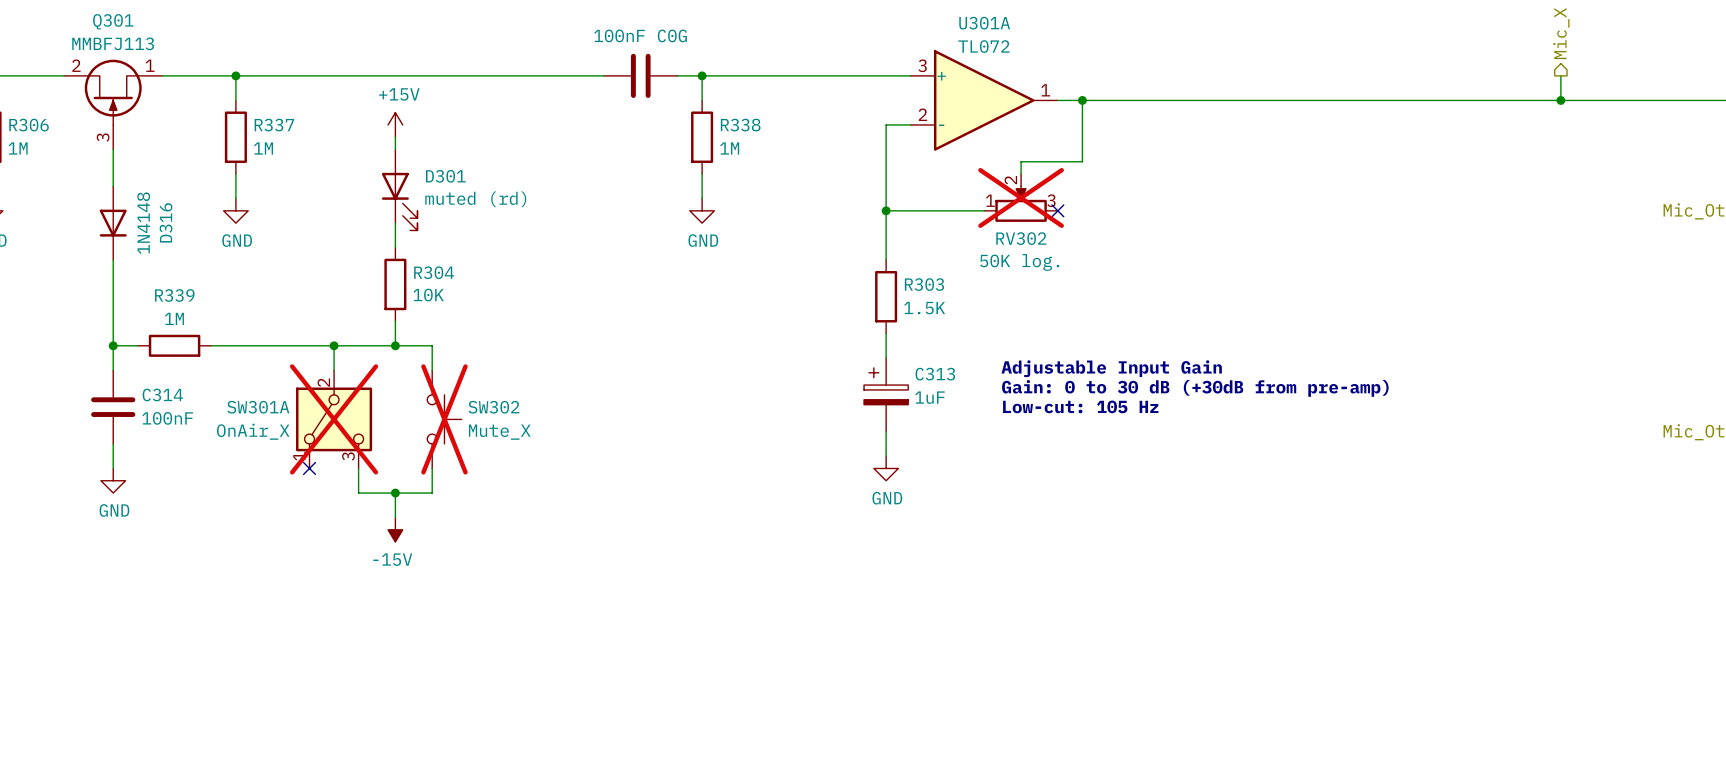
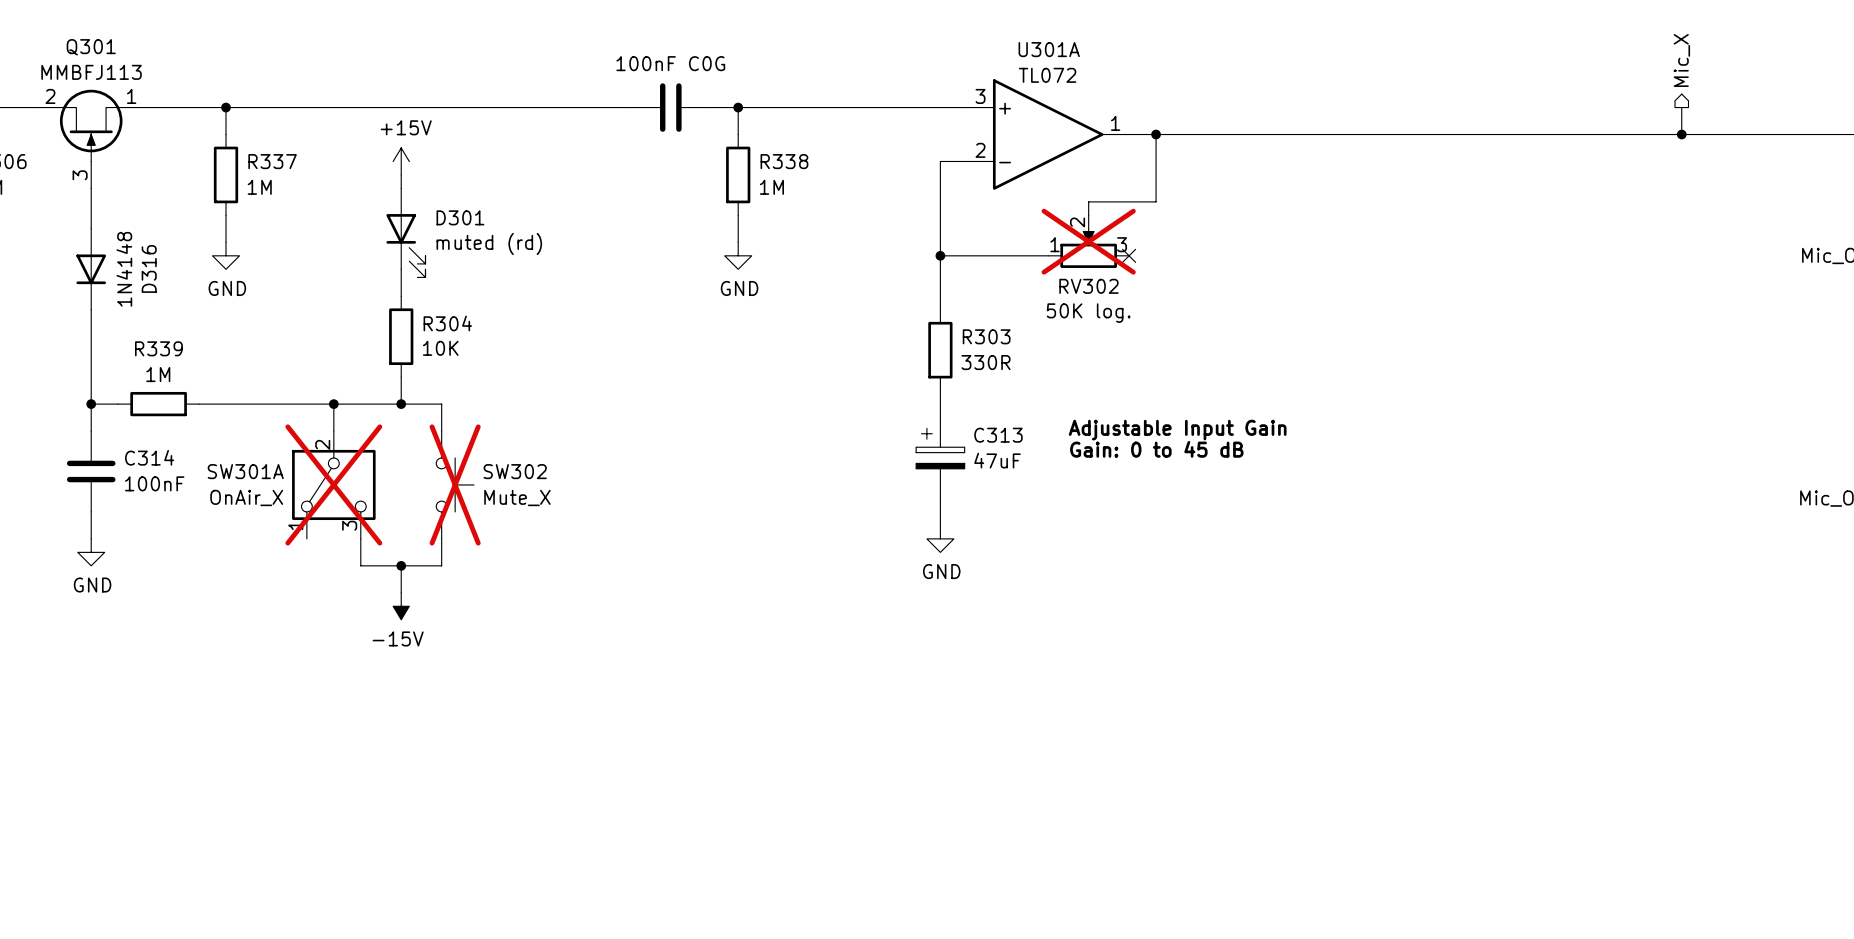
R303 value: 1.5K (924, 308) -> 330R (986, 362)
text: Gain: 0 to 30 dB (+30dB from pre-amp) (1195, 388) -> Gain: 0 to 45 dB (1156, 449)
C313 value: 1uF (930, 397) -> 47uF (997, 460)
text: Low-cut: 105 Hz (1080, 406) -> none
no-connect mark: (309, 468) -> none

